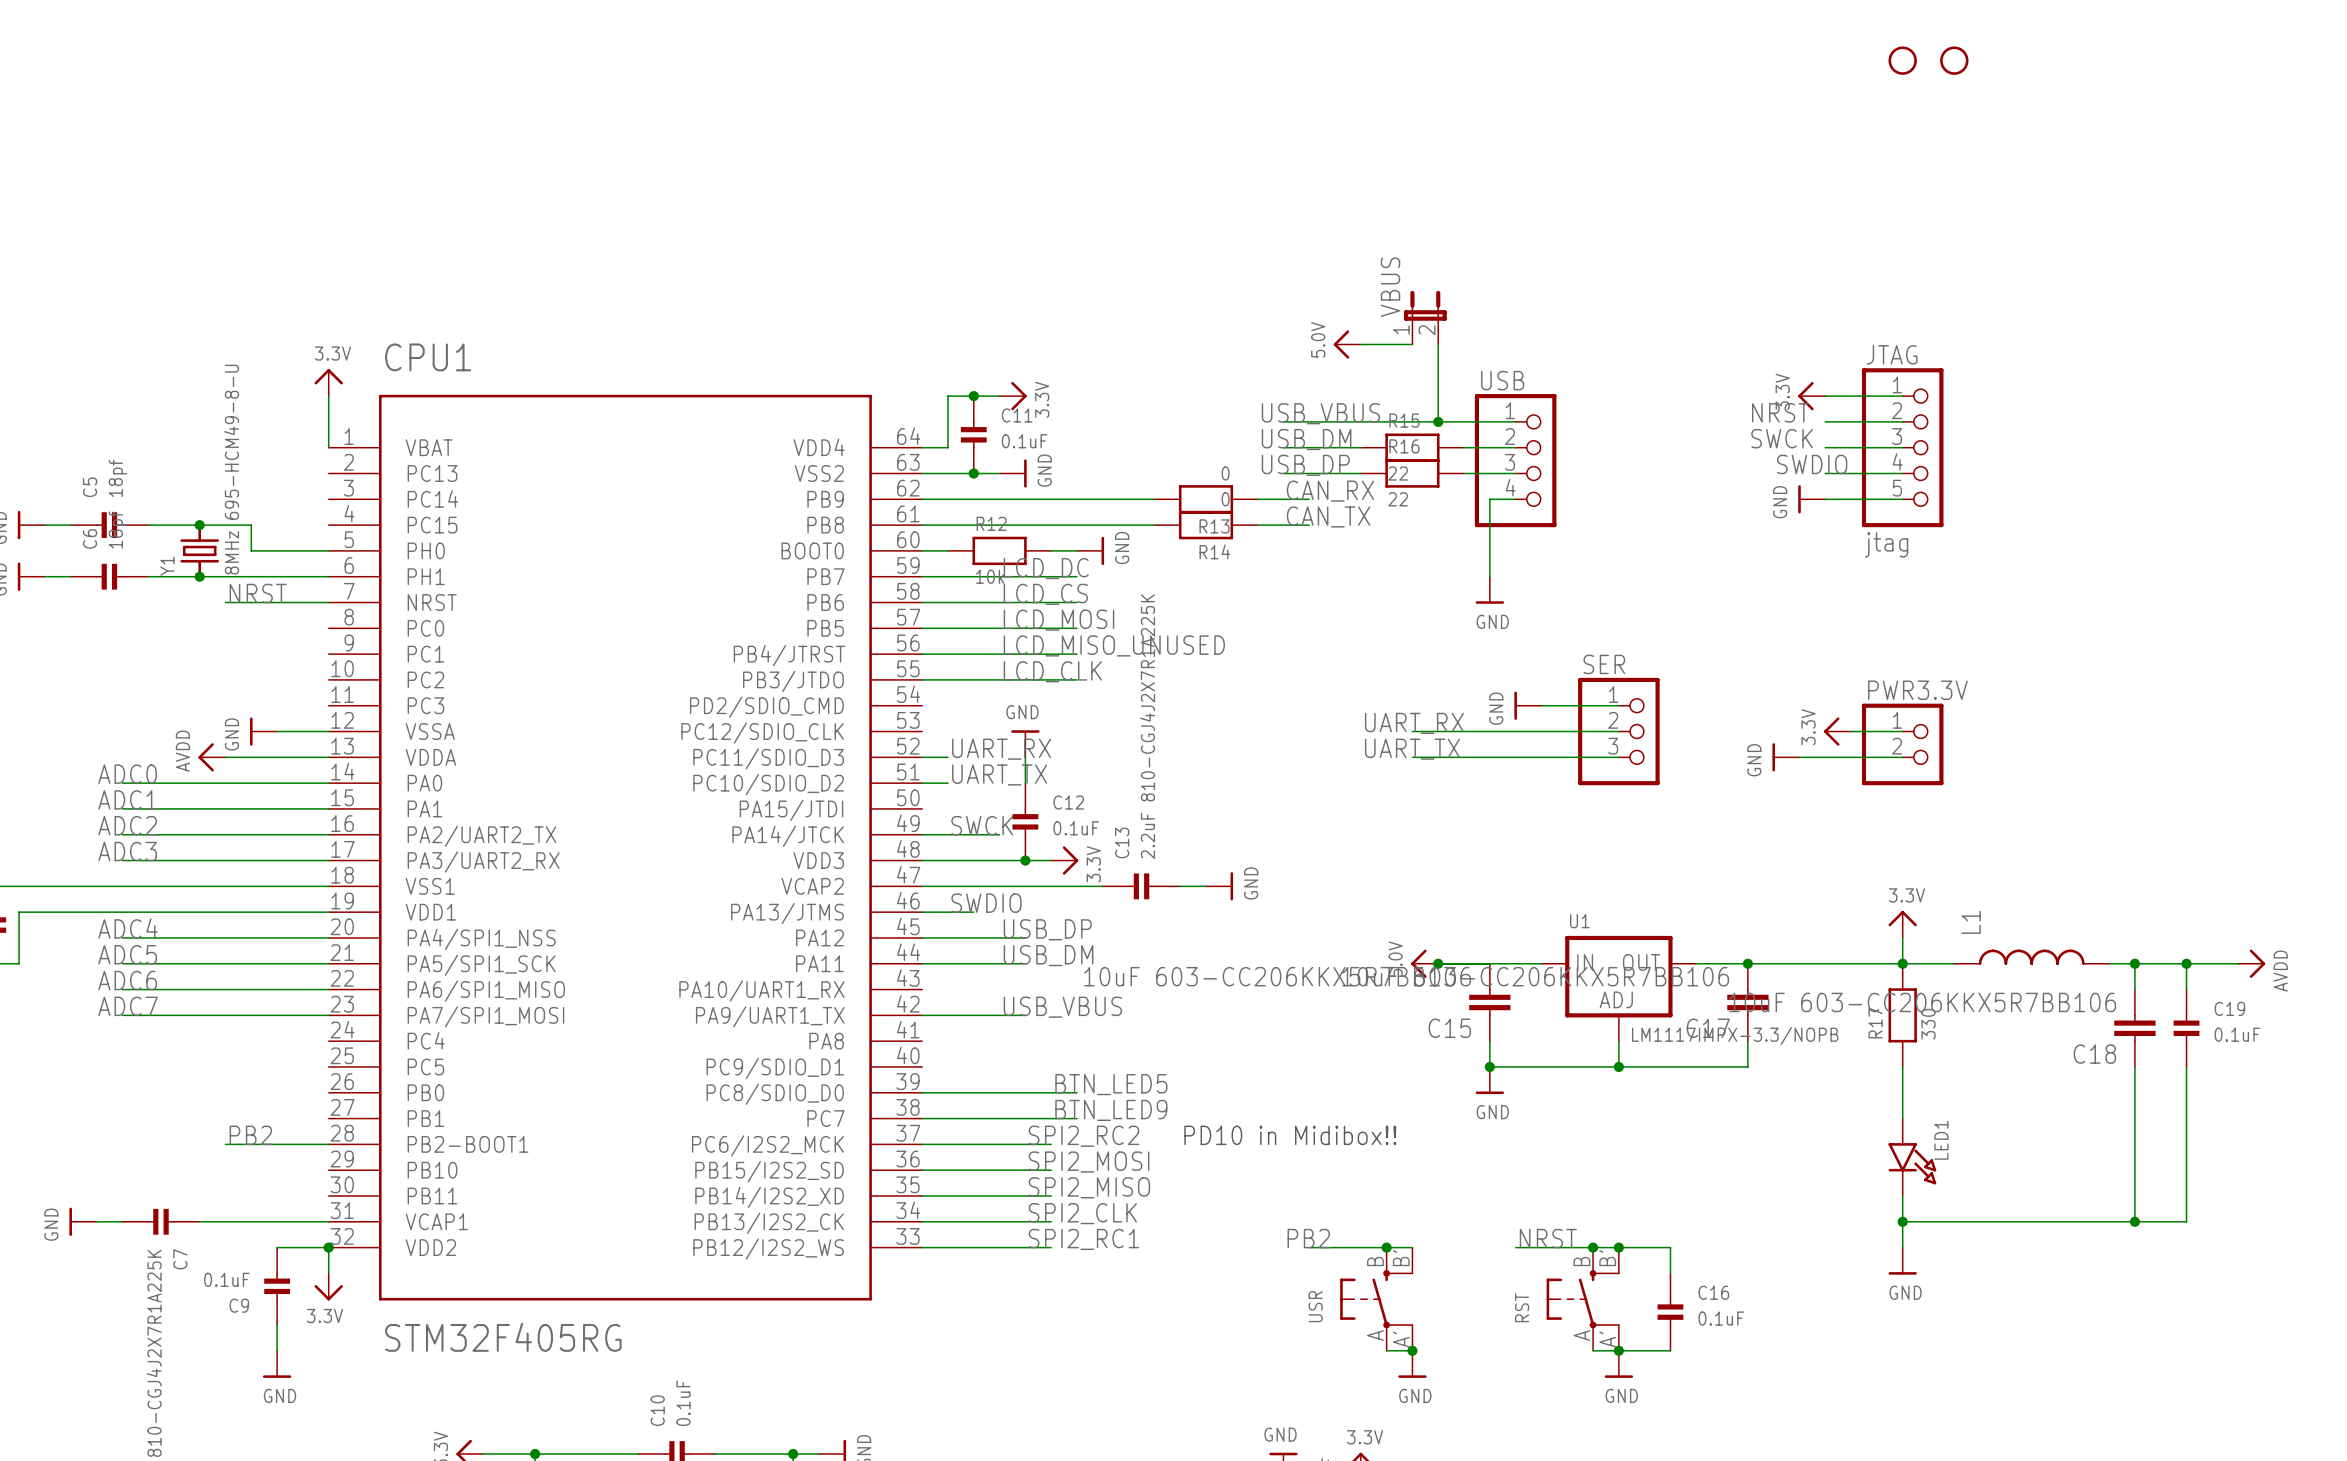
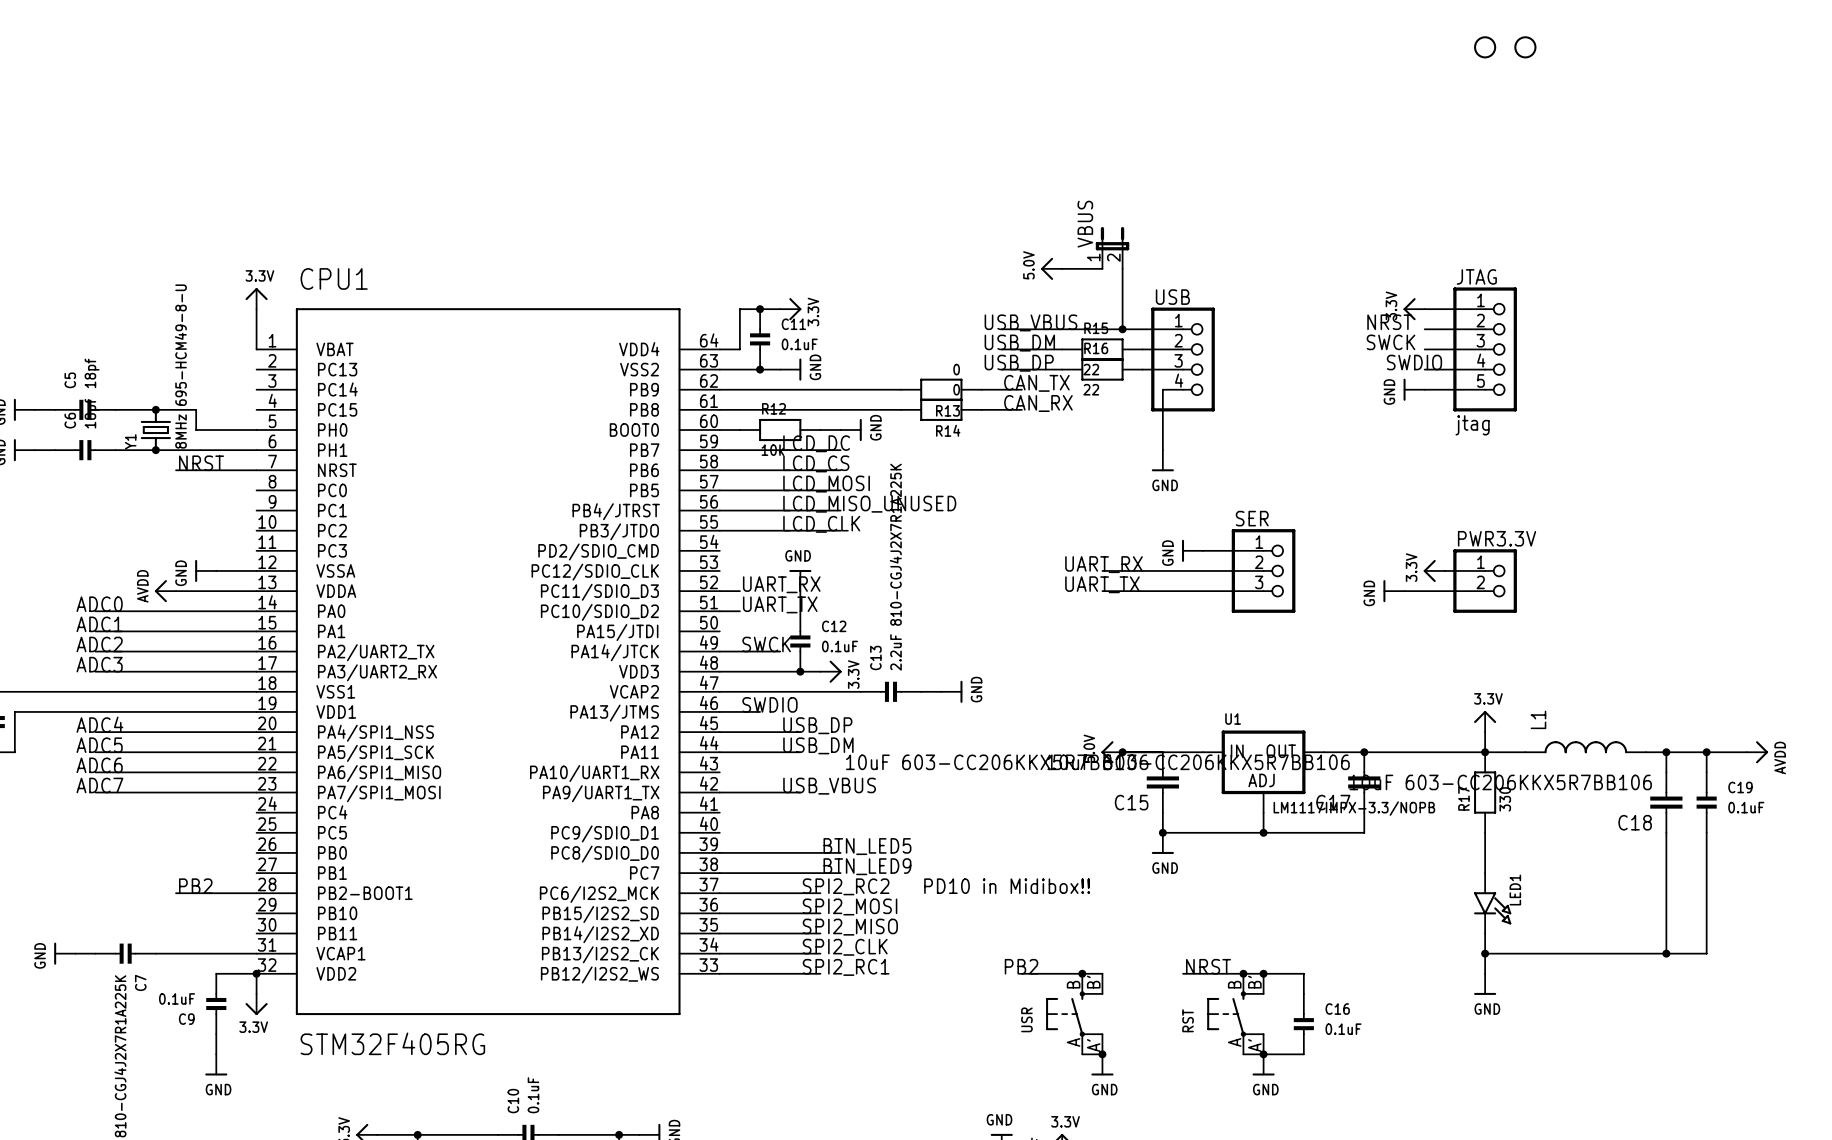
label: CAN_RX (1330, 491) -> CAN_TX (1036, 383)
label: CAN_TX (1328, 516) -> CAN_RX (1038, 403)

